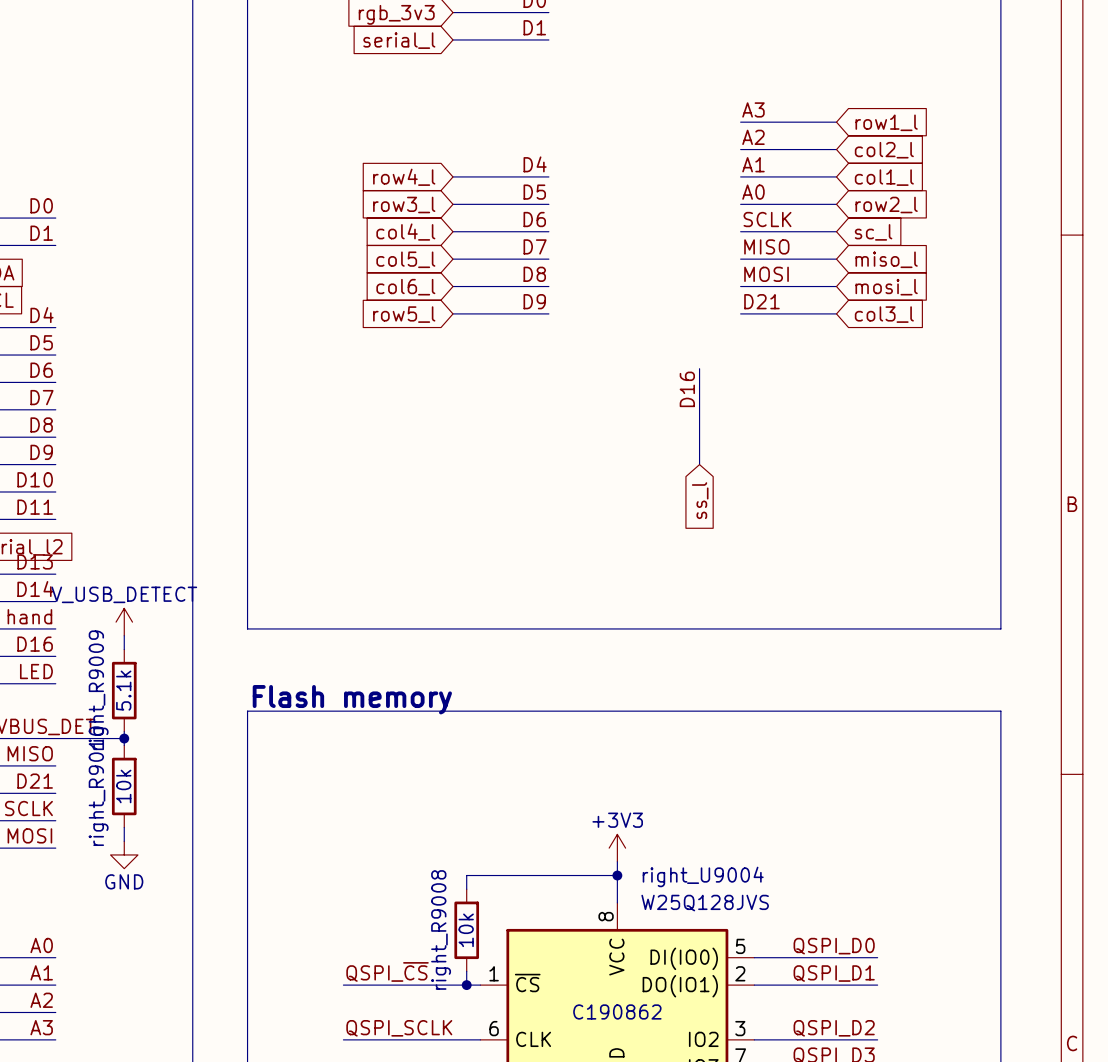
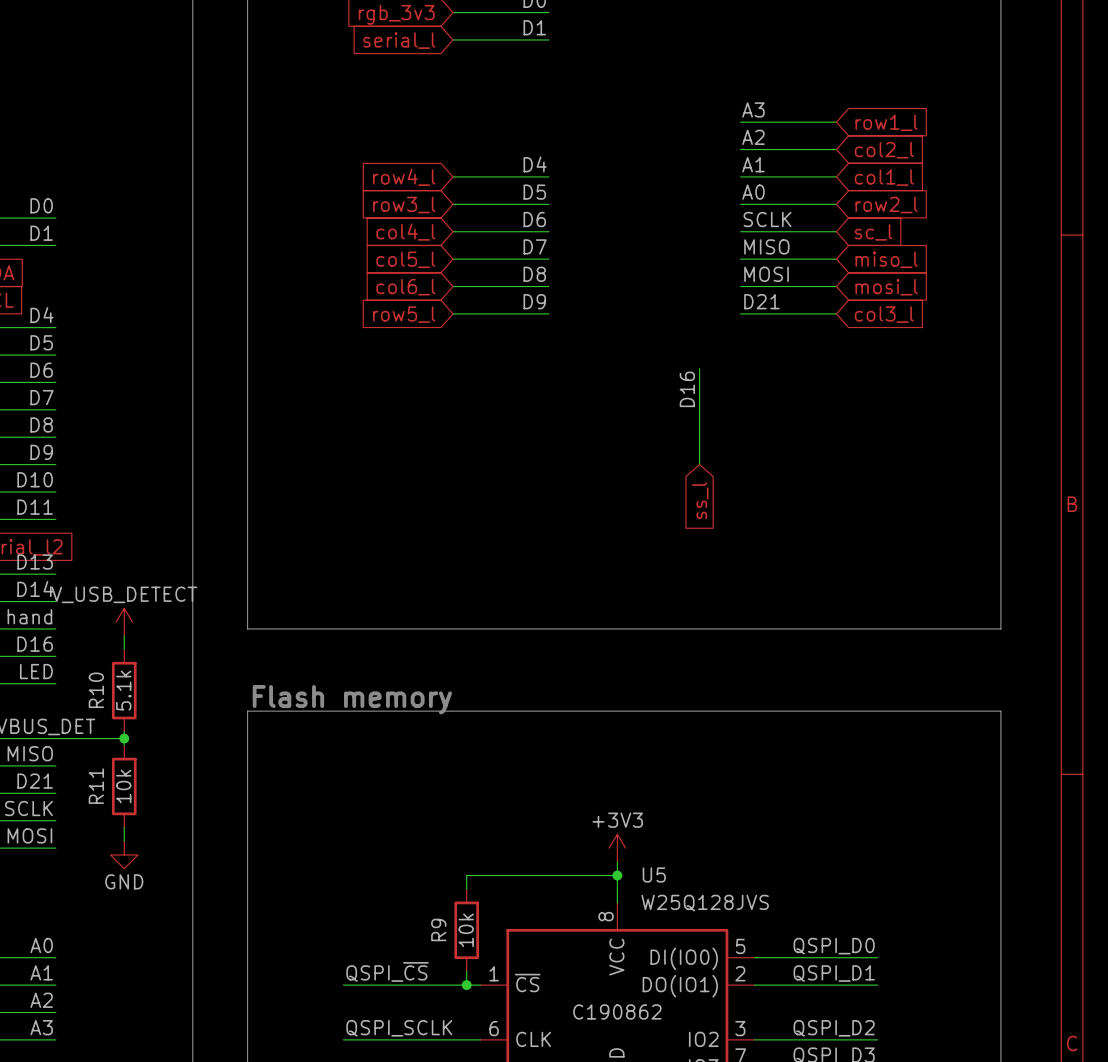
right_R9009 name: right_R9009 (98, 690) -> R10 (96, 690)
right_R9010 name: right_R9010 (98, 786) -> R11 (96, 786)
right_U9004 name: right_U9004 (703, 876) -> U5 (654, 875)
right_R9008 name: right_R9008 (441, 929) -> R9 (438, 929)

